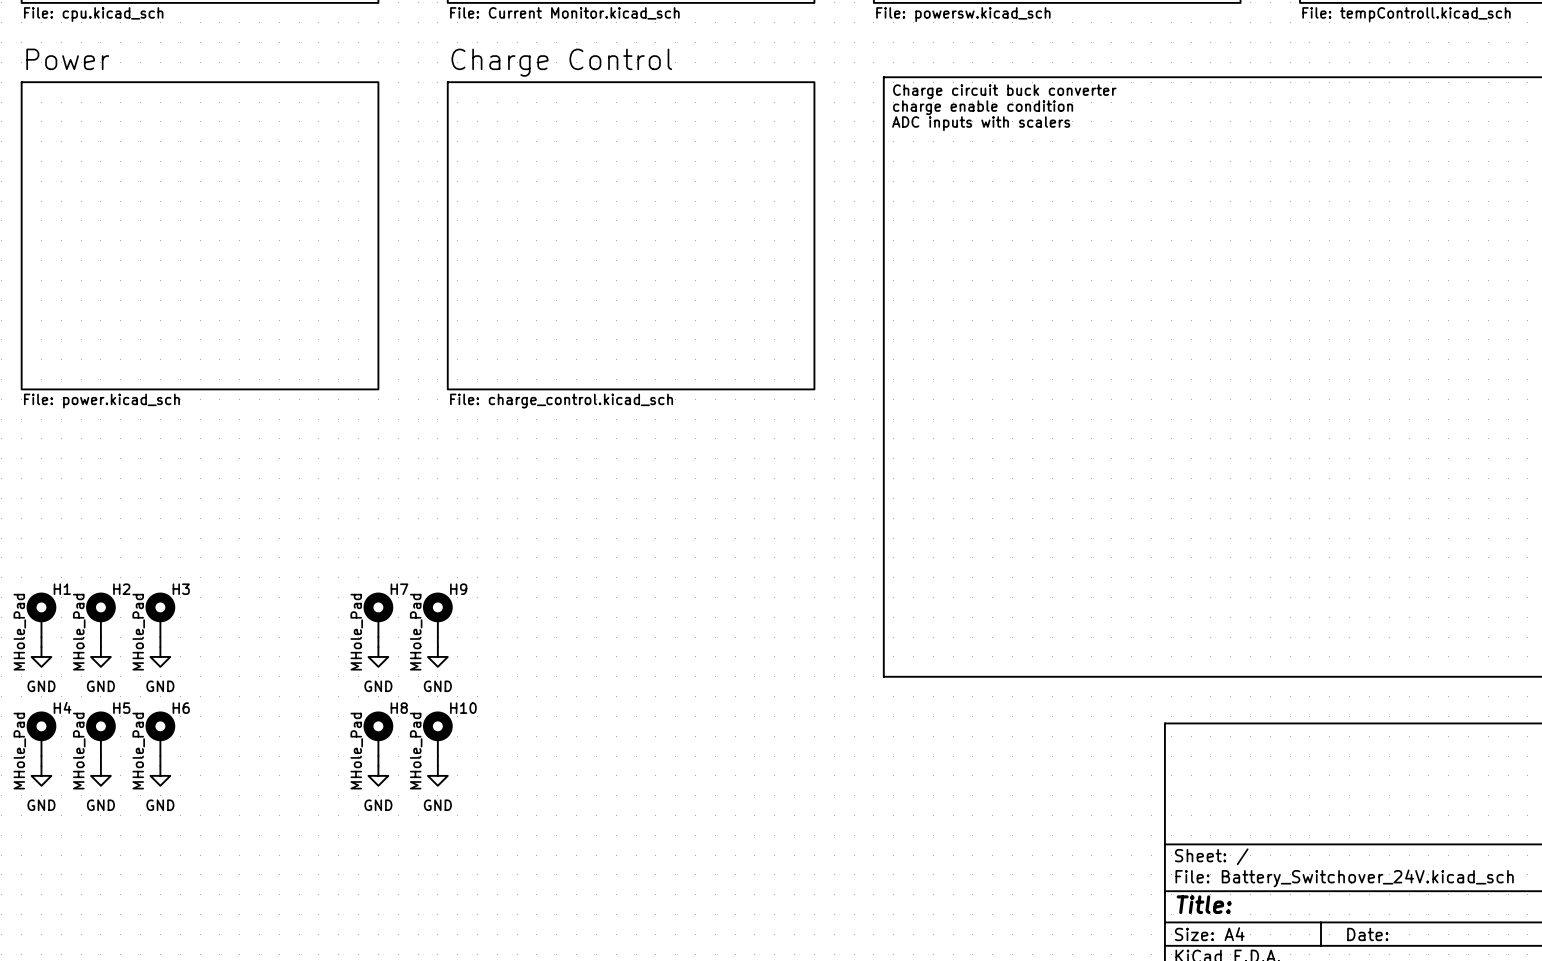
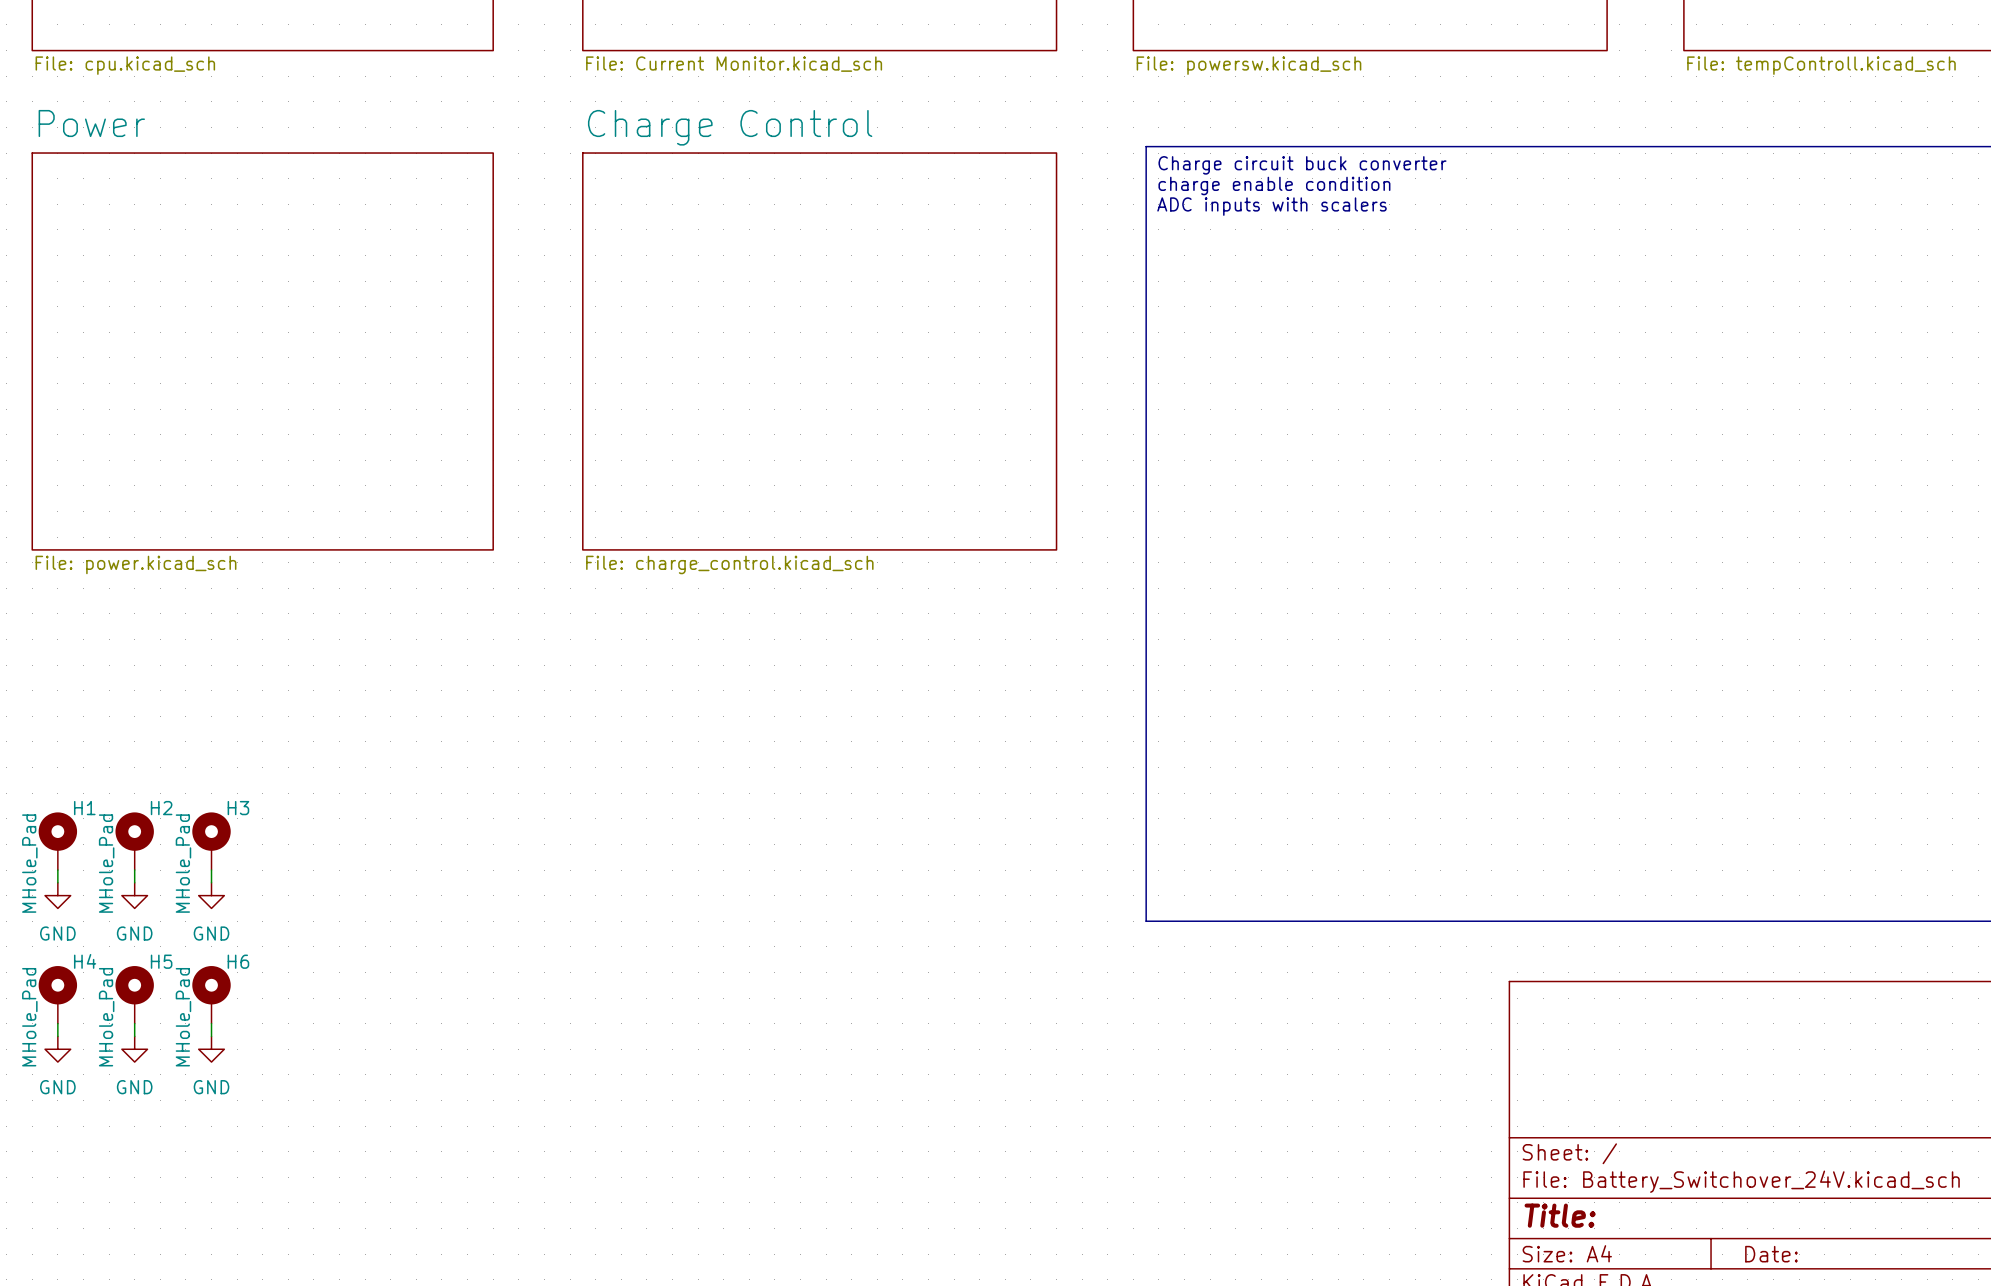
H7: MHole_Pad (378, 614) -> none
H9: MHole_Pad (437, 614) -> none
wire: (378, 637) (378, 647) -> none
wire: (437, 637) (437, 647) -> none
power symbol: GND (378, 656) -> none
power symbol: GND (437, 656) -> none
H8: MHole_Pad (378, 733) -> none
H10: MHole_Pad (437, 733) -> none
wire: (378, 756) (378, 765) -> none
wire: (437, 756) (437, 765) -> none
power symbol: GND (378, 775) -> none
power symbol: GND (437, 775) -> none

